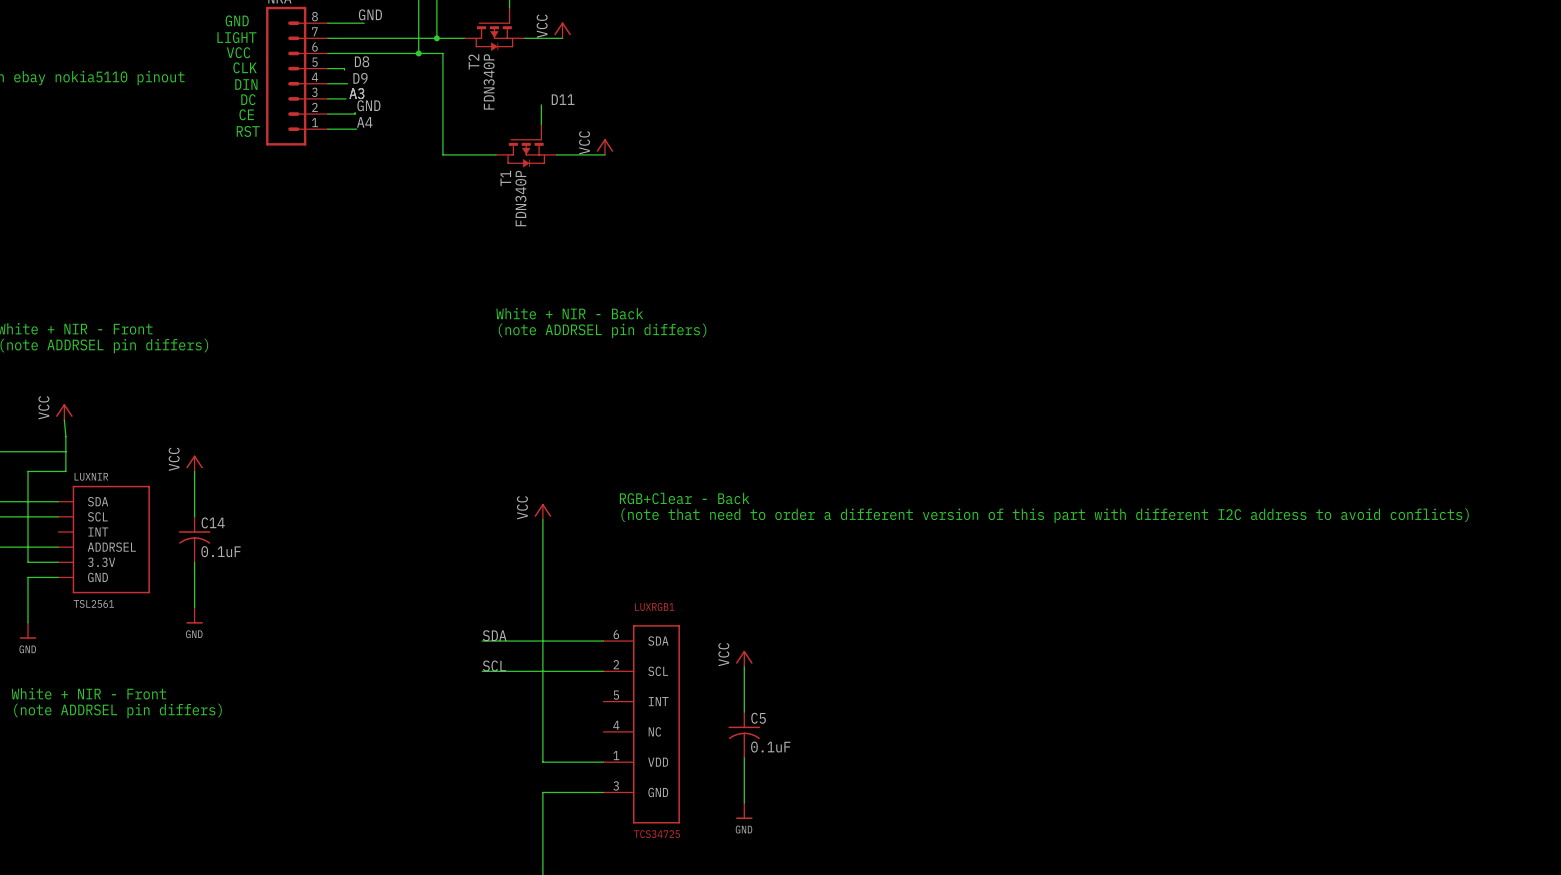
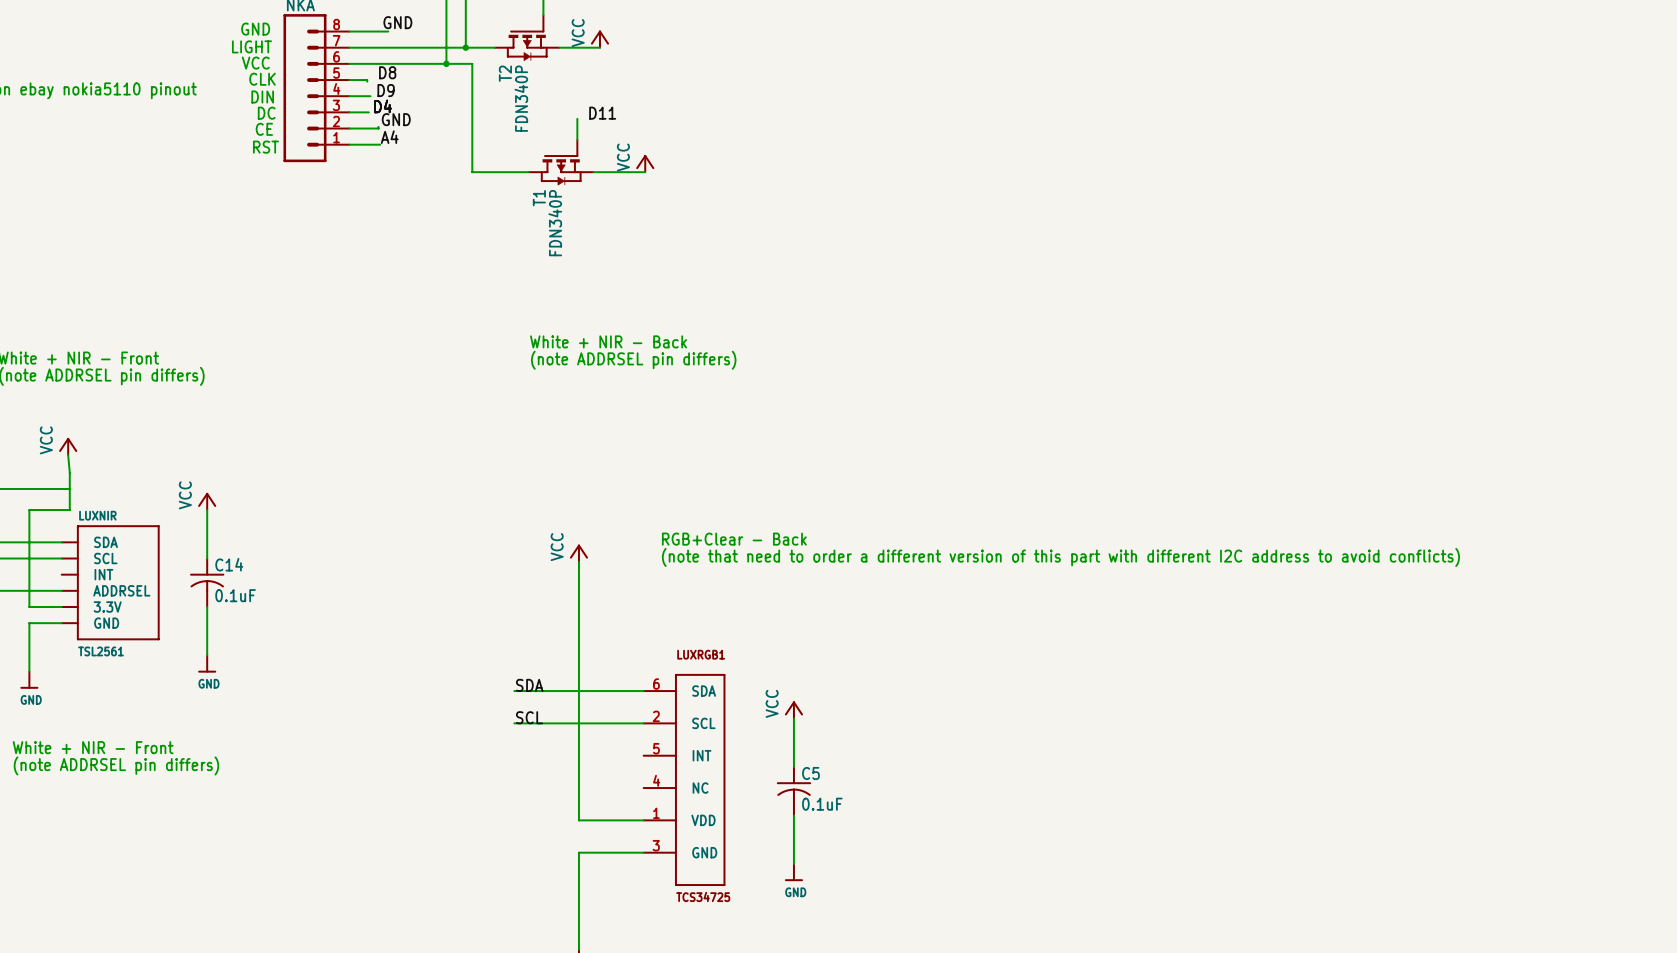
label: A3 (356, 93) -> D4 (383, 106)

